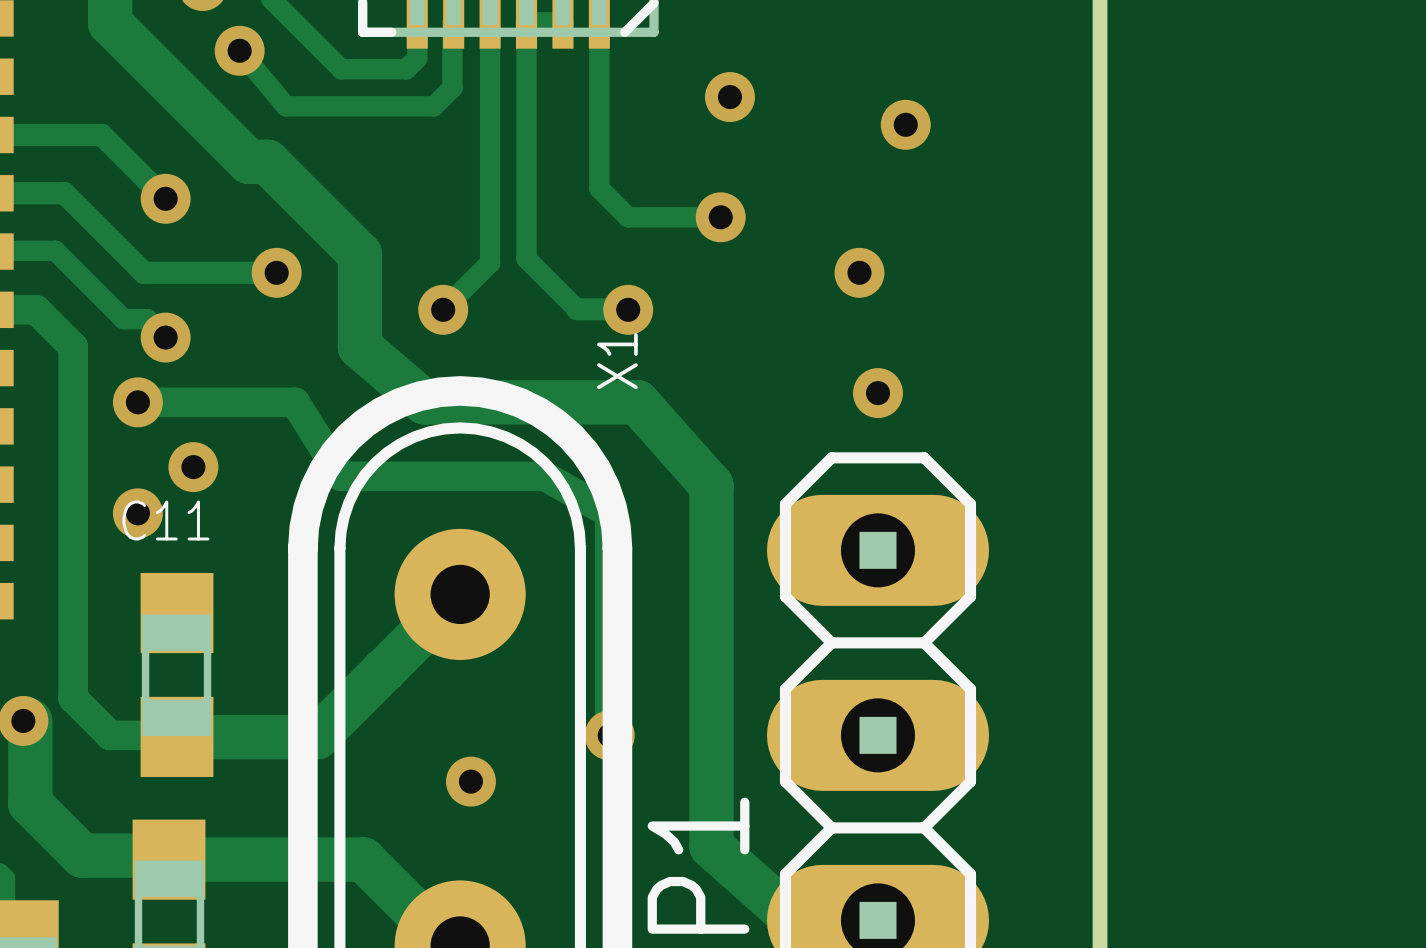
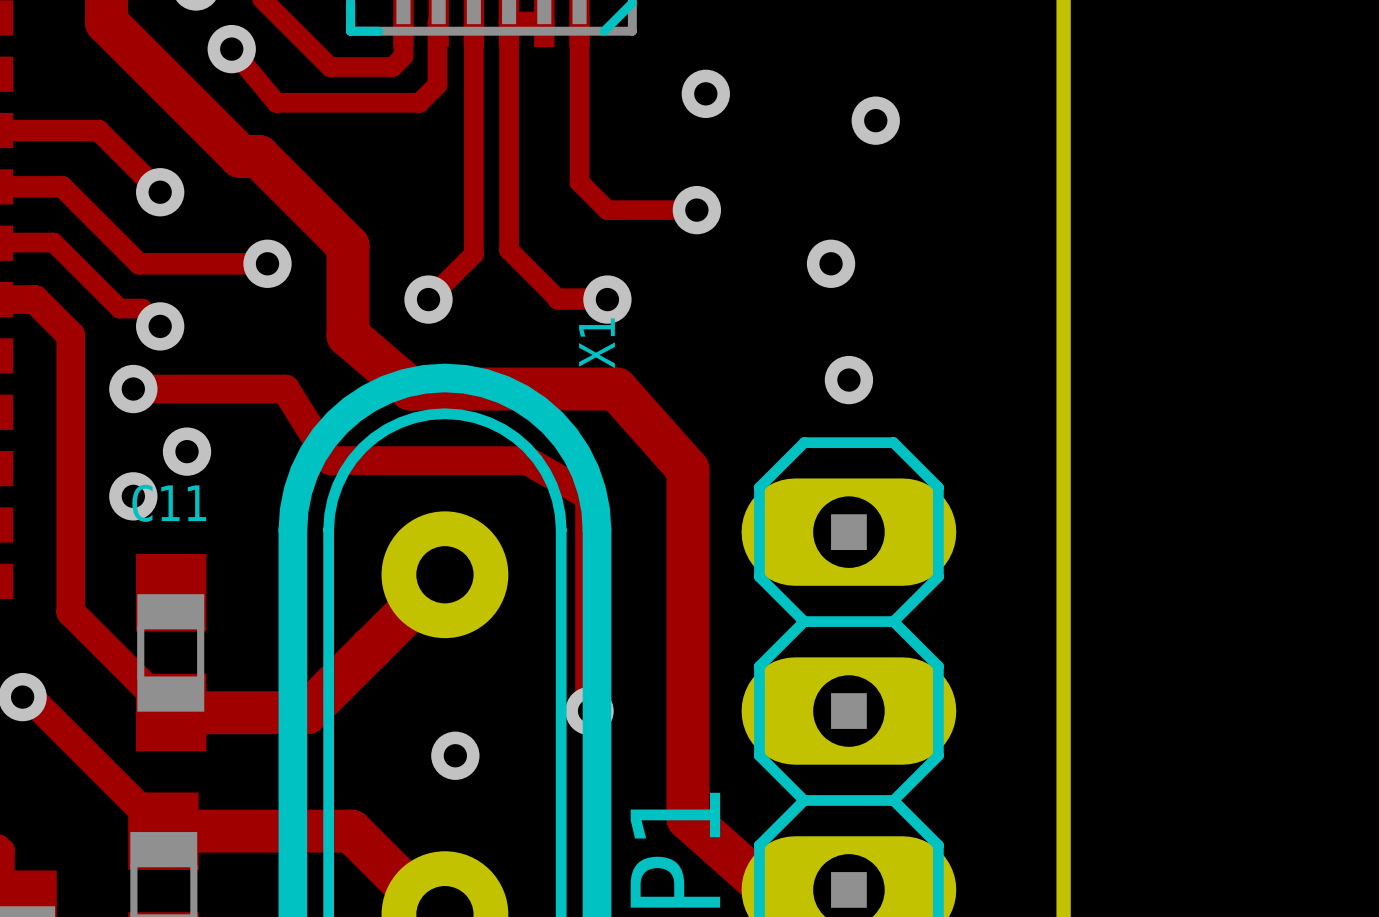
track: (73, 633) (73, 698) (110, 735) (175, 735) -> (70, 612) (169, 711)
track: (30, 720) (30, 803) (82, 855) (165, 855) -> (29, 697) (159, 827)

